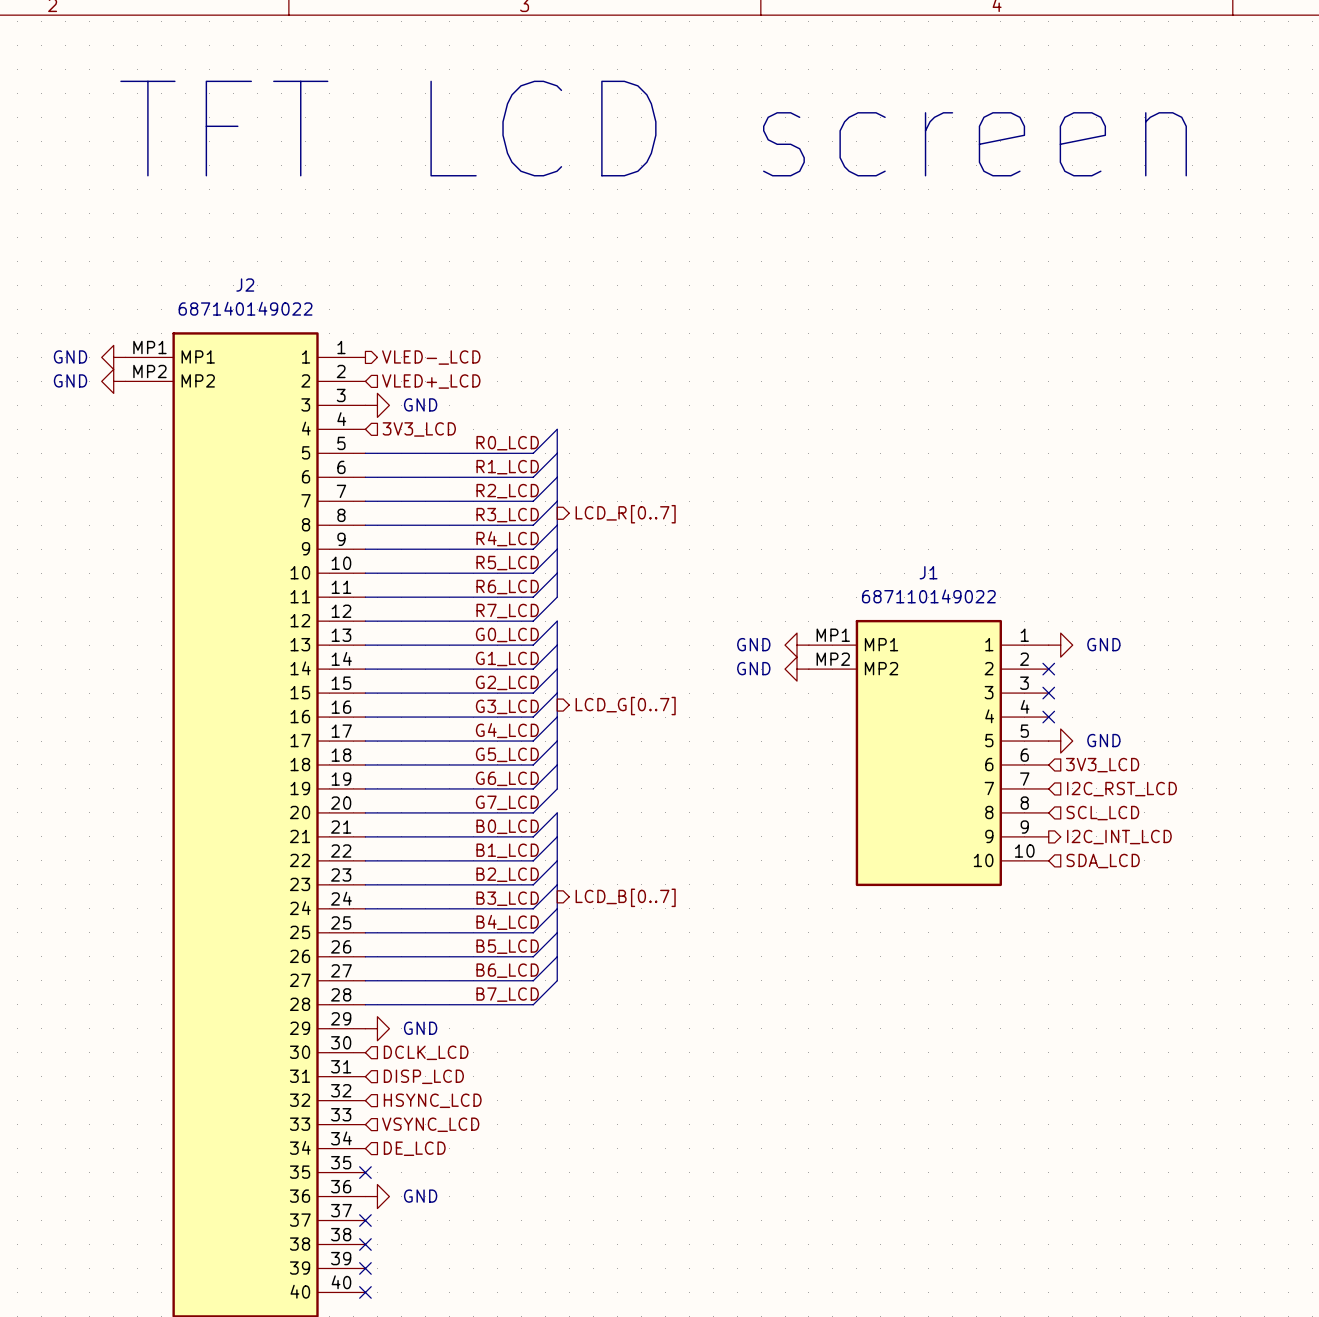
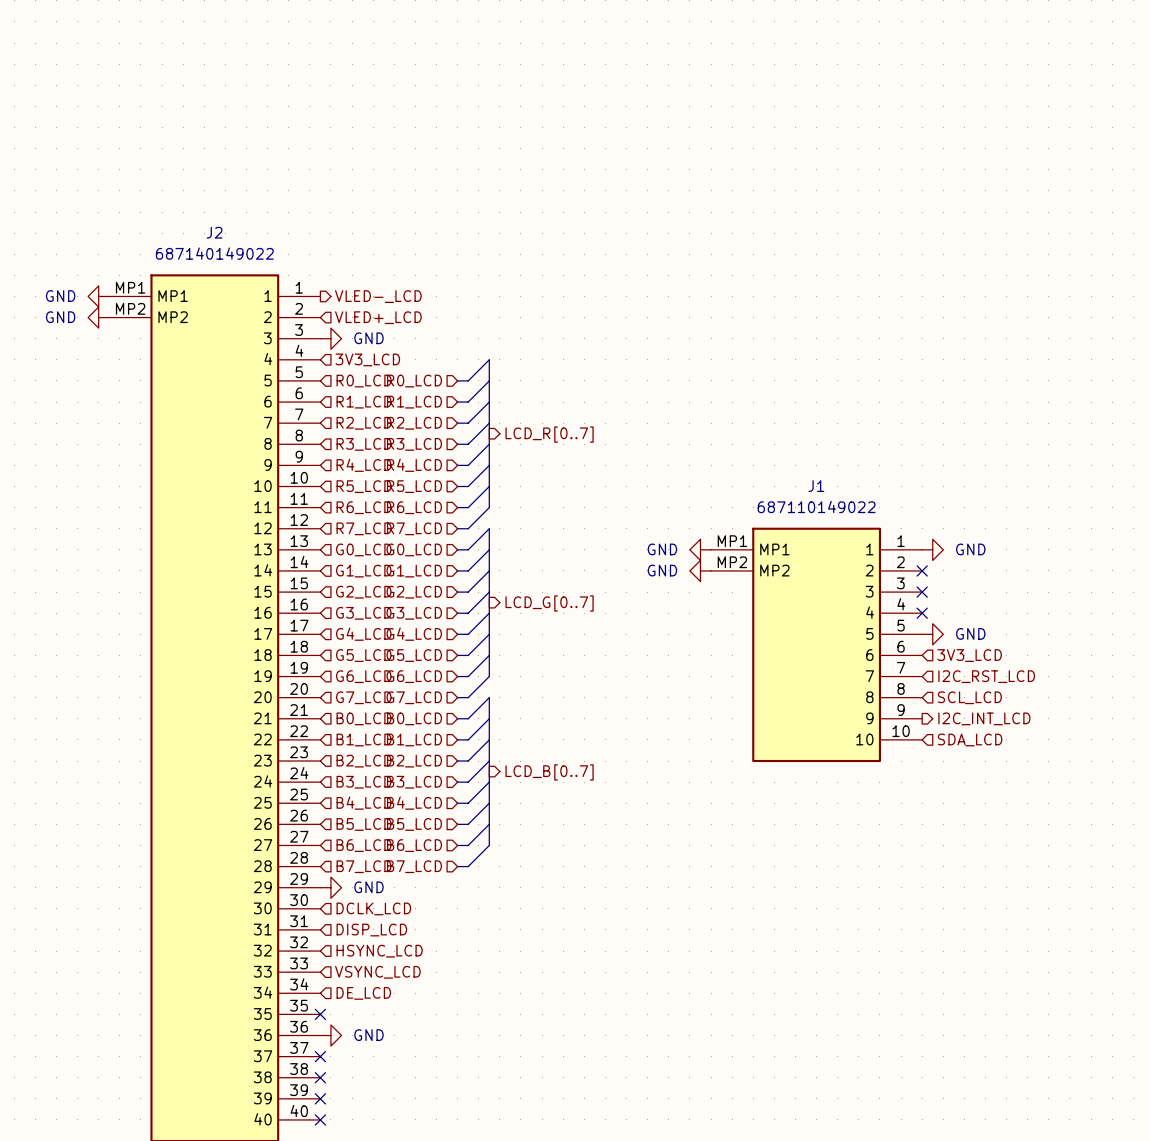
text: TFT LCD screen (653, 128) -> none
label: R0_LCD (507, 443) -> none
wire: (365, 453) (521, 453) -> none
hierarchical label: none -> R0_LCD (364, 381)
hierarchical label: none -> R0_LCD (414, 381)
label: R1_LCD (507, 467) -> none
wire: (365, 477) (521, 477) -> none
hierarchical label: none -> R1_LCD (364, 402)
hierarchical label: none -> R1_LCD (414, 402)
label: R2_LCD (507, 491) -> none
wire: (365, 501) (521, 501) -> none
hierarchical label: none -> R2_LCD (364, 423)
hierarchical label: none -> R2_LCD (414, 423)
label: R3_LCD (507, 515) -> none
wire: (365, 525) (521, 525) -> none
hierarchical label: none -> R3_LCD (364, 444)
hierarchical label: none -> R3_LCD (414, 444)
label: R4_LCD (507, 538) -> none
wire: (365, 549) (521, 549) -> none
hierarchical label: none -> R4_LCD (364, 465)
hierarchical label: none -> R4_LCD (414, 465)
label: R5_LCD (507, 563) -> none
wire: (365, 573) (521, 573) -> none
hierarchical label: none -> R5_LCD (364, 486)
hierarchical label: none -> R5_LCD (414, 486)
label: R6_LCD (507, 587) -> none
wire: (365, 597) (521, 597) -> none
hierarchical label: none -> R6_LCD (364, 507)
hierarchical label: none -> R6_LCD (414, 507)
label: R7_LCD (507, 611) -> none
wire: (365, 621) (521, 621) -> none
hierarchical label: none -> R7_LCD (364, 528)
hierarchical label: none -> R7_LCD (414, 528)
label: G0_LCD (507, 634) -> none
wire: (365, 645) (521, 645) -> none
hierarchical label: none -> G0_LCD (363, 549)
hierarchical label: none -> G0_LCD (414, 549)
label: G1_LCD (507, 658) -> none
wire: (365, 669) (521, 669) -> none
hierarchical label: none -> G1_LCD (363, 571)
hierarchical label: none -> G1_LCD (414, 571)
label: G2_LCD (507, 682) -> none
wire: (365, 693) (521, 693) -> none
hierarchical label: none -> G2_LCD (363, 592)
hierarchical label: none -> G2_LCD (414, 592)
label: G3_LCD (507, 706) -> none
wire: (365, 717) (521, 717) -> none
hierarchical label: none -> G3_LCD (363, 613)
hierarchical label: none -> G3_LCD (414, 613)
label: G4_LCD (507, 730) -> none
hierarchical label: none -> G4_LCD (363, 634)
hierarchical label: none -> G4_LCD (414, 634)
wire: (365, 741) (521, 741) -> none
label: G5_LCD (507, 754) -> none
wire: (365, 764) (521, 764) -> none
hierarchical label: none -> G5_LCD (363, 655)
hierarchical label: none -> G5_LCD (414, 655)
label: G6_LCD (507, 778) -> none
wire: (365, 788) (521, 788) -> none
hierarchical label: none -> G6_LCD (363, 676)
hierarchical label: none -> G6_LCD (414, 676)
label: G7_LCD (507, 802) -> none
wire: (365, 812) (521, 812) -> none
hierarchical label: none -> G7_LCD (363, 697)
hierarchical label: none -> G7_LCD (414, 697)
label: B0_LCD (507, 826) -> none
wire: (365, 836) (521, 836) -> none
hierarchical label: none -> B0_LCD (364, 718)
hierarchical label: none -> B0_LCD (414, 718)
label: B1_LCD (507, 850) -> none
wire: (365, 860) (521, 860) -> none
hierarchical label: none -> B1_LCD (364, 740)
hierarchical label: none -> B1_LCD (414, 740)
label: B2_LCD (507, 874) -> none
wire: (365, 884) (521, 884) -> none
hierarchical label: none -> B2_LCD (364, 761)
hierarchical label: none -> B2_LCD (414, 761)
label: B3_LCD (507, 898) -> none
wire: (365, 908) (521, 908) -> none
hierarchical label: none -> B3_LCD (364, 782)
hierarchical label: none -> B3_LCD (414, 782)
label: B4_LCD (507, 922) -> none
wire: (365, 932) (521, 932) -> none
hierarchical label: none -> B4_LCD (364, 803)
hierarchical label: none -> B4_LCD (414, 803)
label: B5_LCD (507, 946) -> none
wire: (365, 956) (521, 956) -> none
hierarchical label: none -> B5_LCD (364, 824)
hierarchical label: none -> B5_LCD (414, 824)
label: B6_LCD (507, 970) -> none
wire: (365, 980) (521, 980) -> none
hierarchical label: none -> B6_LCD (364, 845)
hierarchical label: none -> B6_LCD (414, 845)
label: B7_LCD (507, 994) -> none
wire: (365, 1004) (521, 1004) -> none
hierarchical label: none -> B7_LCD (364, 866)
hierarchical label: none -> B7_LCD (414, 866)

